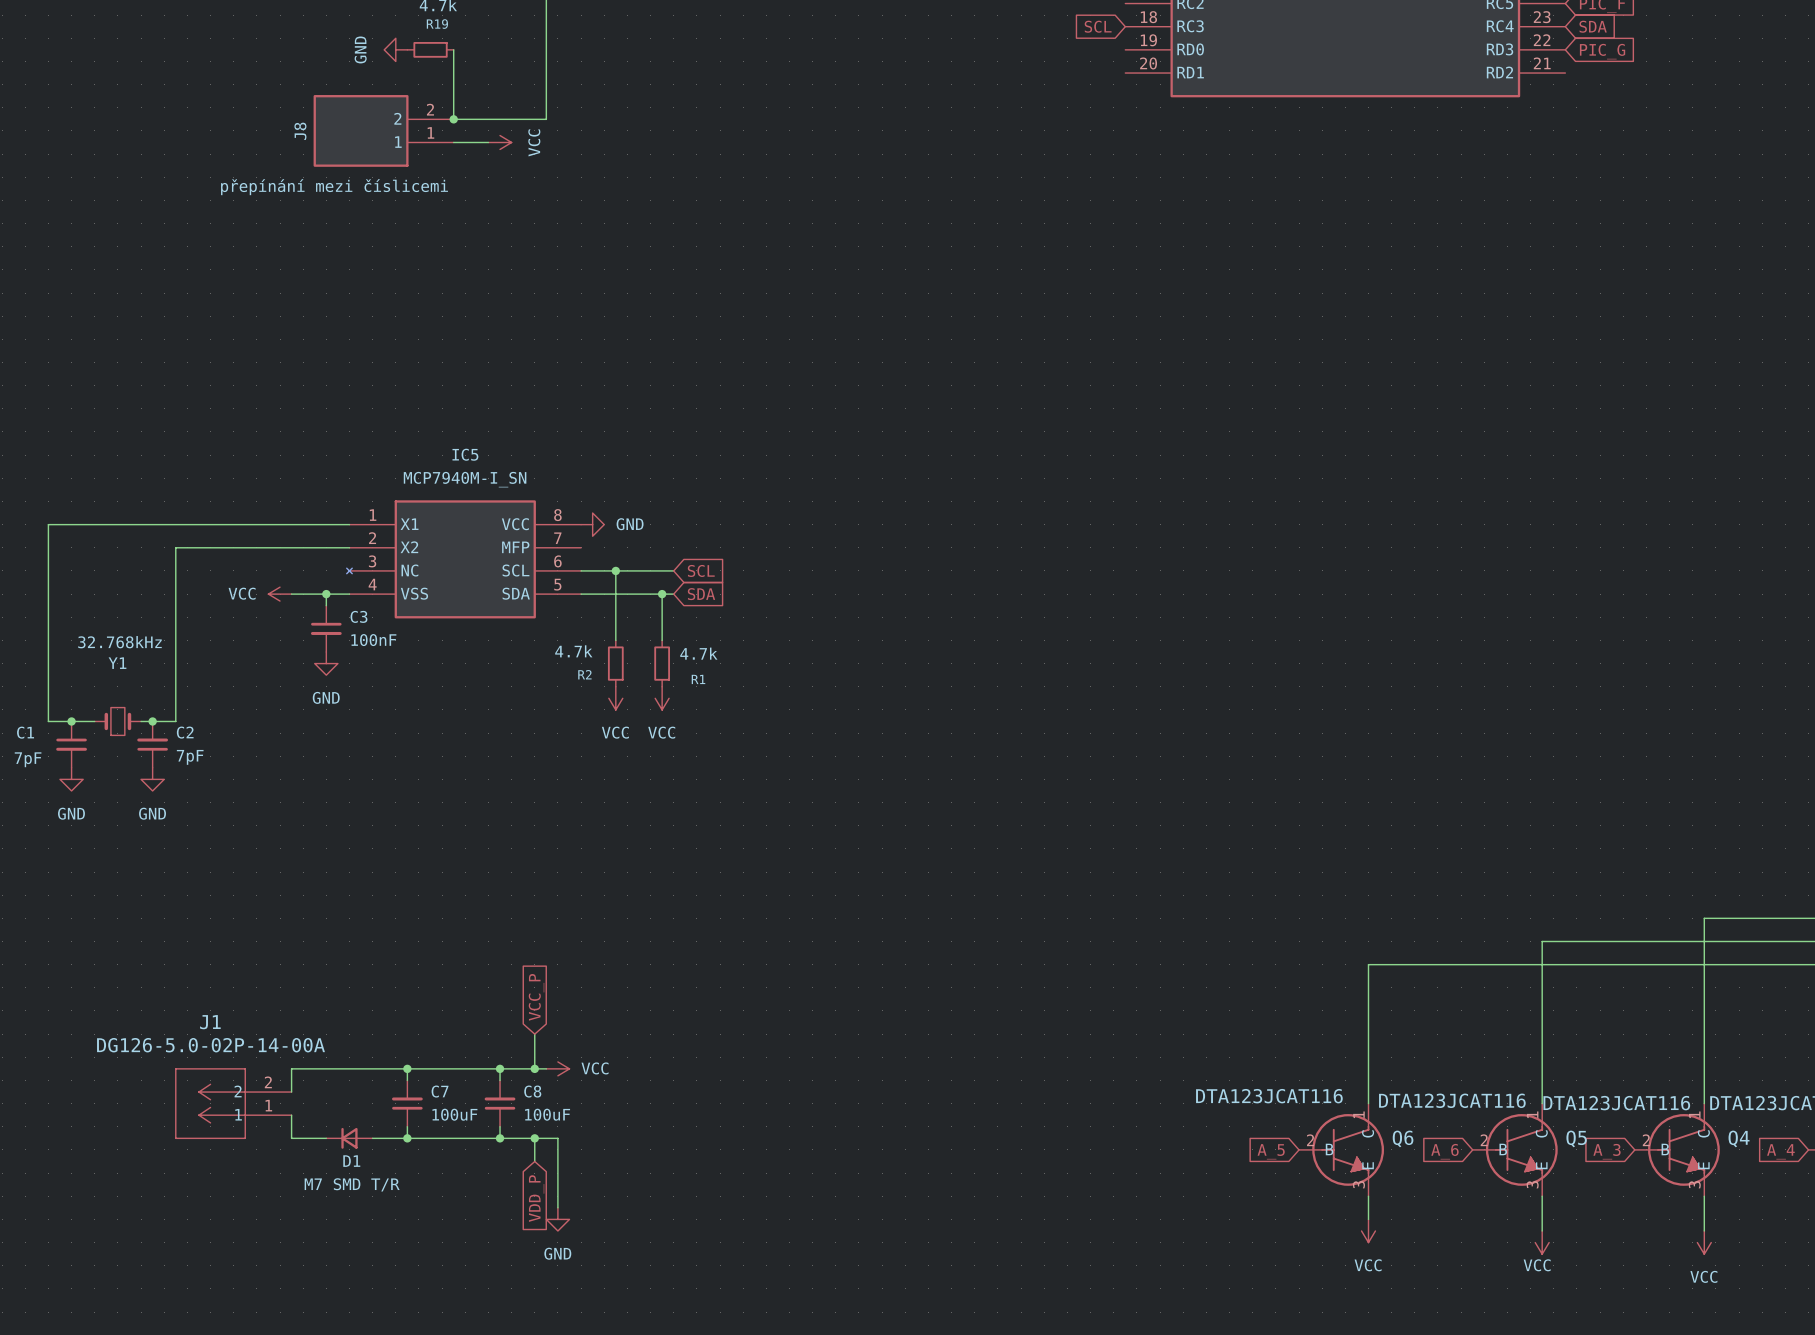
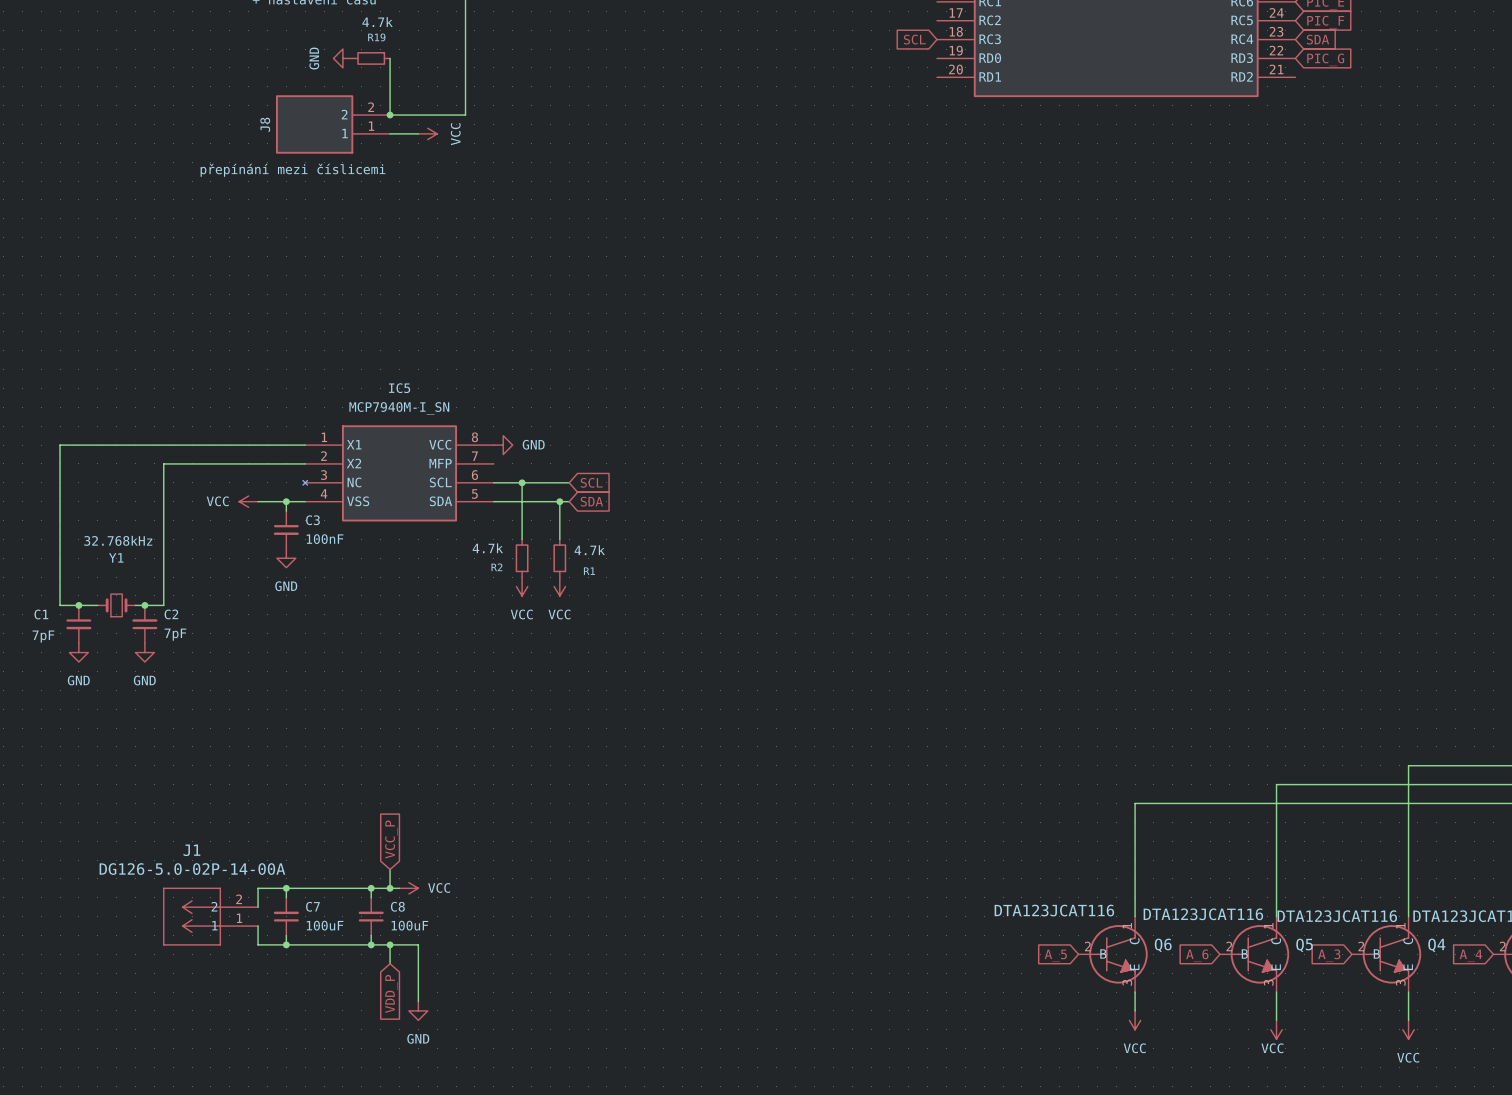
global label position: VCC_P (536, 997) -> VCC_P (391, 839)
wire: (534, 1034) (534, 1068) -> none
wire: none -> (390, 869) (390, 888)
junction: none -> (286, 888)
wire: (407, 1068) (407, 1080) -> (371, 888) (371, 897)
junction: (407, 1068) -> none
junction: none -> (371, 888)
junction: none -> (390, 888)
wire: (465, 1068) (546, 1068) -> none
wire: (500, 1068) (500, 1080) -> (286, 888) (286, 897)
junction: (500, 1068) -> none
junction: (534, 1068) -> none
power symbol position: VCC (557, 1068) -> VCC (408, 888)
C7 position: (407, 1103) -> (286, 916)
C8 position: (500, 1103) -> (371, 916)
wire: (407, 1126) (407, 1138) -> (371, 935) (371, 944)
wire: (500, 1126) (500, 1138) -> none
junction: none -> (286, 944)
D1: M7 SMD T/R (349, 1138) -> none
junction: (407, 1138) -> none
junction: none -> (371, 944)
junction: none -> (390, 944)
wire: (488, 1138) (557, 1138) (557, 1207) -> (418, 944) (418, 1001)
junction: (500, 1138) -> none
wire: (534, 1138) (534, 1161) -> (390, 944) (390, 963)
junction: (534, 1138) -> none
global label position: VDD_P (536, 1198) -> VDD_P (391, 993)
power symbol position: GND (557, 1219) -> GND (418, 1010)

